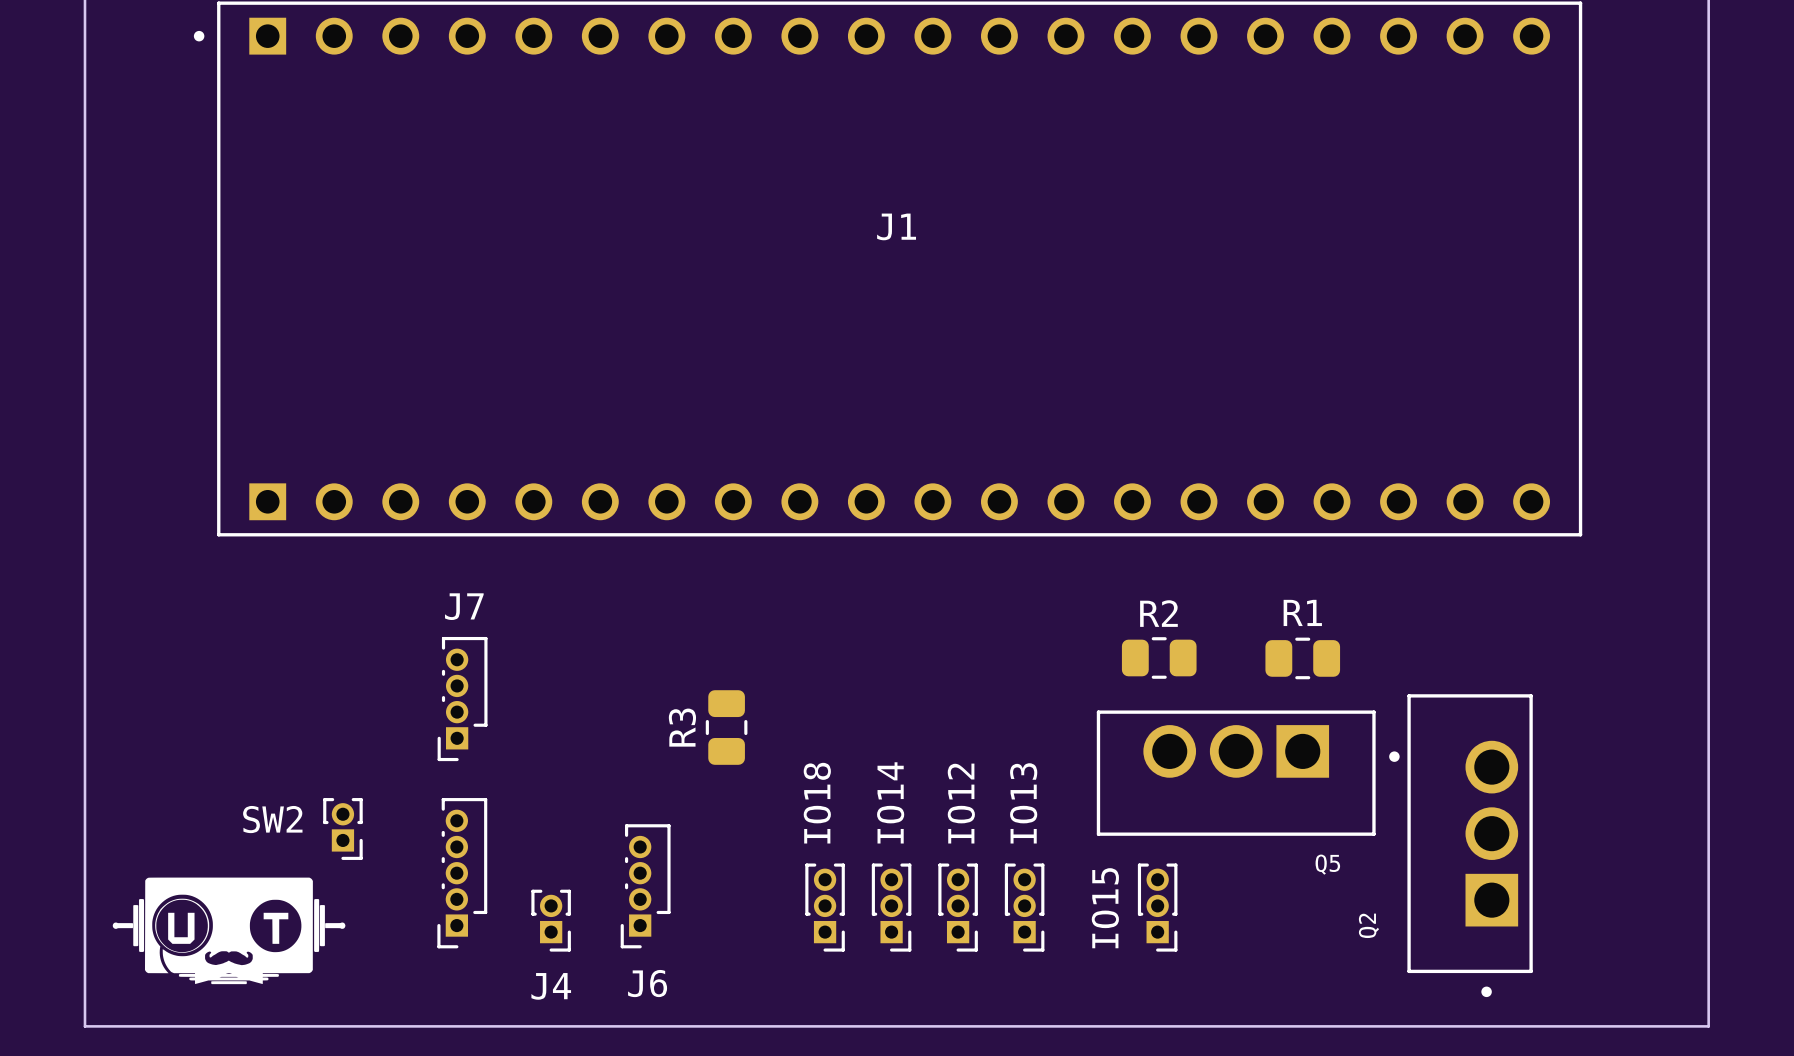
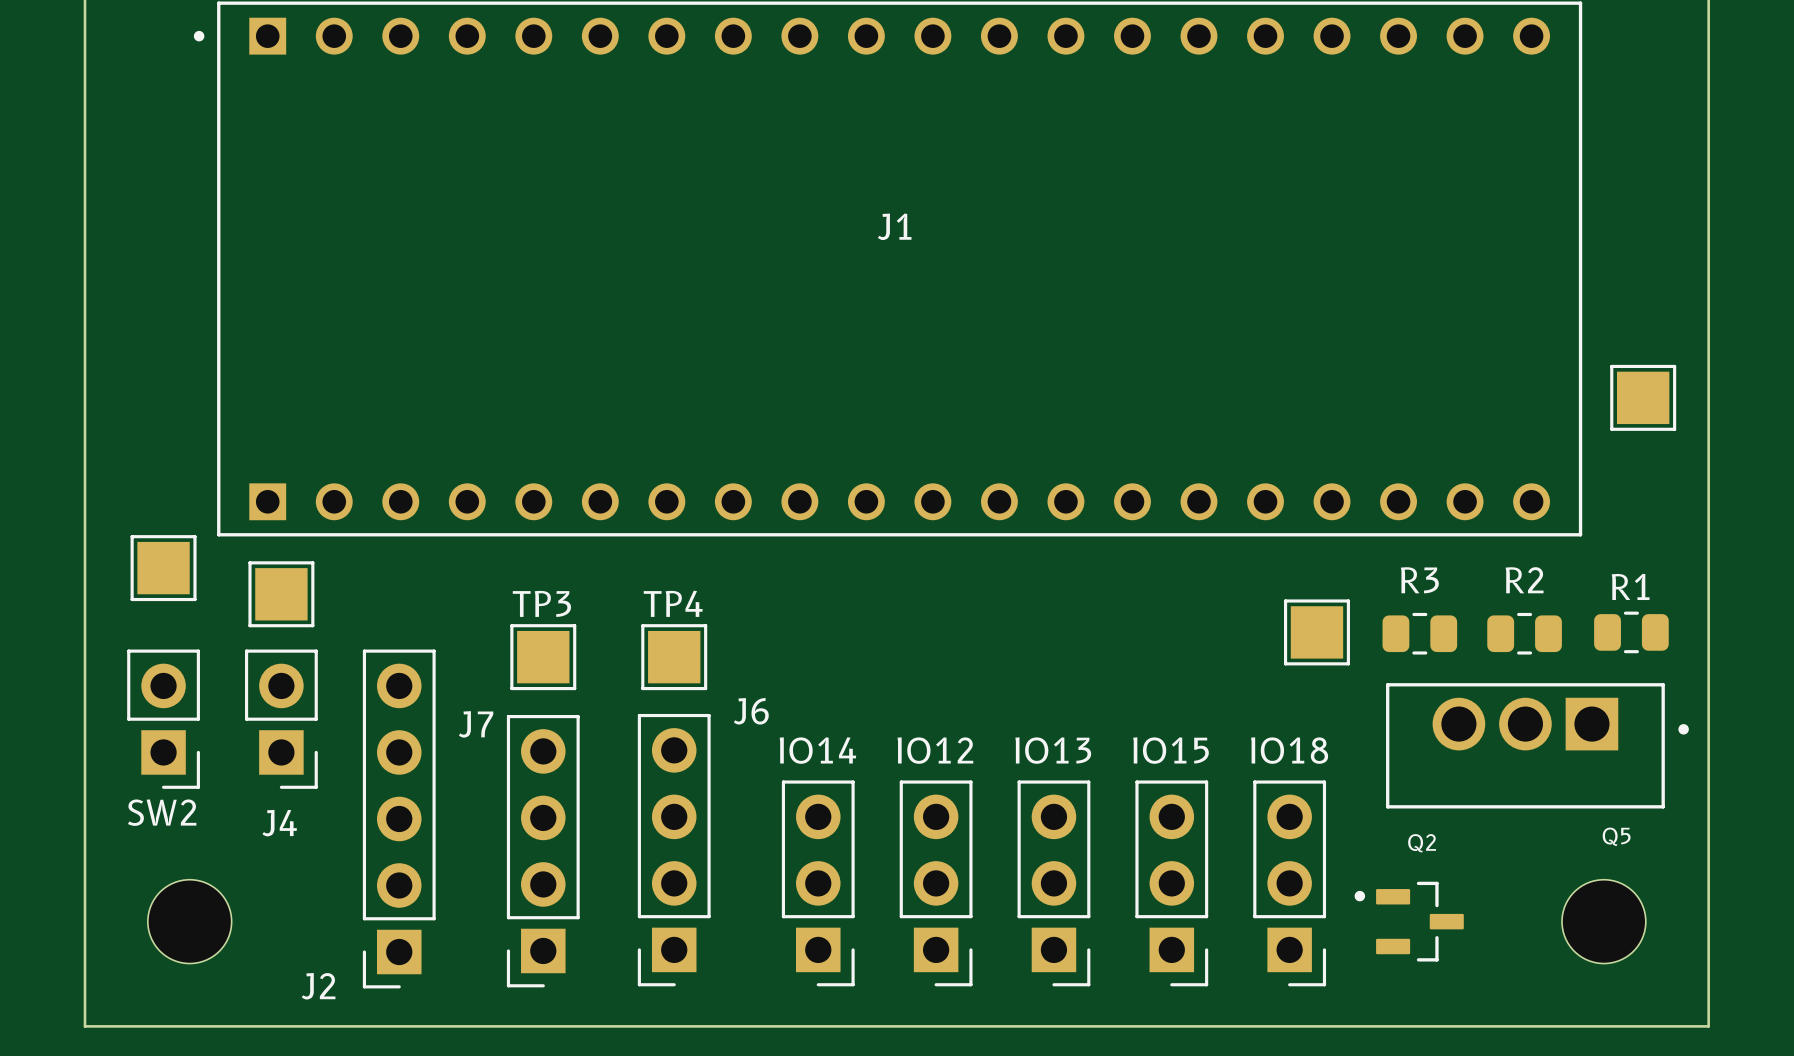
part: none -> (1643, 397)
part: none -> (163, 568)
part: none -> (281, 594)
J7 name position: J7 (464, 606) -> J7 (476, 724)
R2 name position: R2 (1158, 613) -> R2 (1524, 580)
part: none -> (1316, 632)
J7 footprint: [437, 636, 488, 762] -> [506, 715, 580, 988]
TP3: none -> (543, 657)
TP4: none -> (674, 657)
R2 position: (1159, 657) -> (1524, 633)
R1 position: (1302, 658) -> (1631, 632)
Q2 footprint: [1407, 694, 1533, 998] -> [1354, 881, 1464, 962]
R3 rotation: 0° (726, 727) -> 90° clockwise (1419, 633)
R3 position: (726, 727) -> (1419, 633)
Q5 position: (1248, 773) -> (1537, 745)
SW2 footprint: [323, 798, 363, 860] -> [127, 649, 200, 789]
J2: none -> (399, 818)
SW2 name position: SW2 (272, 819) -> SW2 (162, 812)
J6 footprint: [620, 824, 671, 949] -> [637, 713, 711, 987]
IO18 footprint: [805, 863, 845, 952] -> [1253, 780, 1327, 987]
IO14 footprint: [871, 863, 912, 952] -> [781, 780, 855, 987]
IO12 footprint: [938, 863, 978, 952] -> [899, 780, 973, 987]
IO13 footprint: [1004, 863, 1045, 952] -> [1017, 780, 1091, 987]
IO15 footprint: [1137, 863, 1178, 952] -> [1135, 780, 1209, 987]
part: (462, 873) -> none
drawing: [112, 877, 346, 985] -> none
J4 footprint: [531, 889, 571, 952] -> [245, 649, 318, 789]
IO15 name position: IO15 (1105, 908) -> IO15 (1171, 750)
part: none -> (189, 921)
part: none -> (1603, 921)
Q2 name position: Q2 (1368, 925) -> Q2 (1422, 843)
J6 name position: J6 (647, 983) -> J6 (751, 711)

